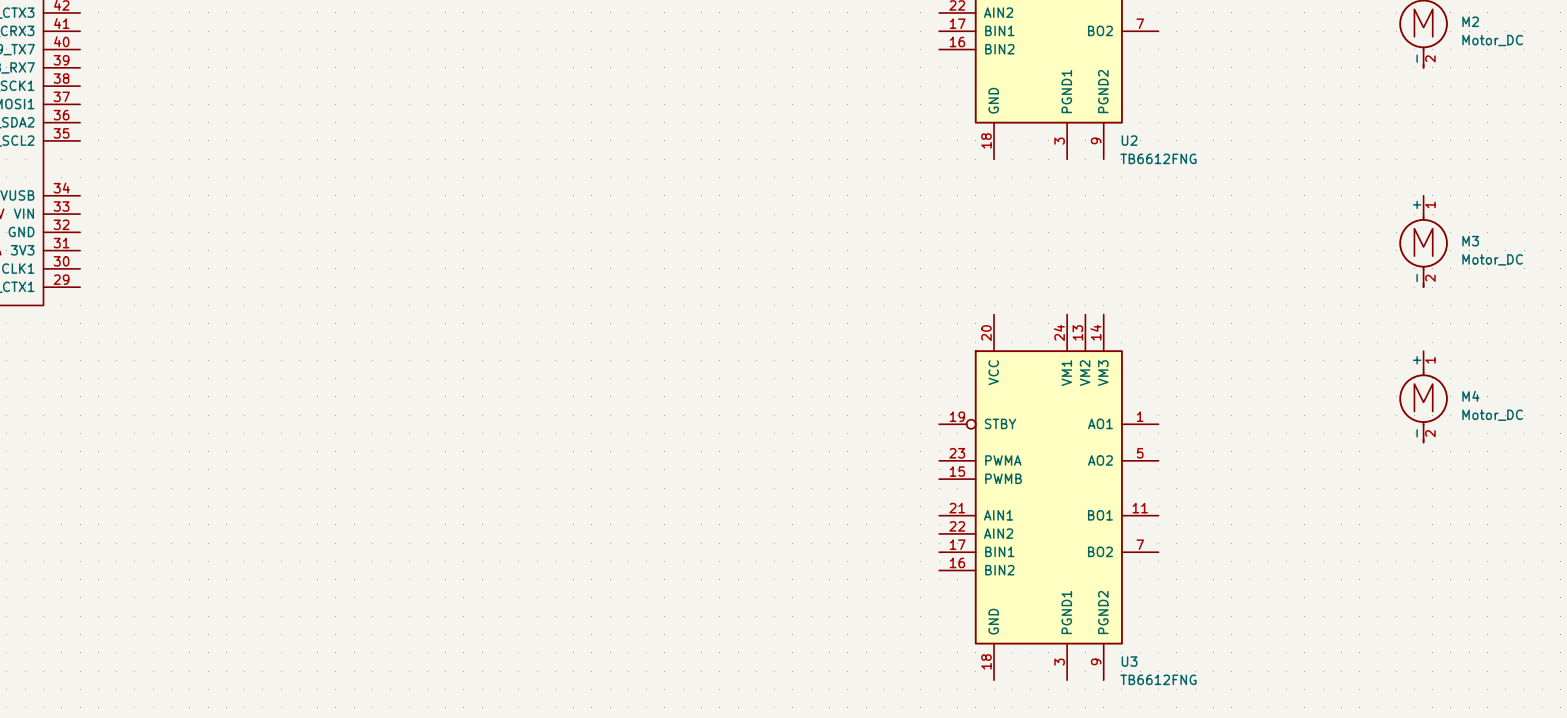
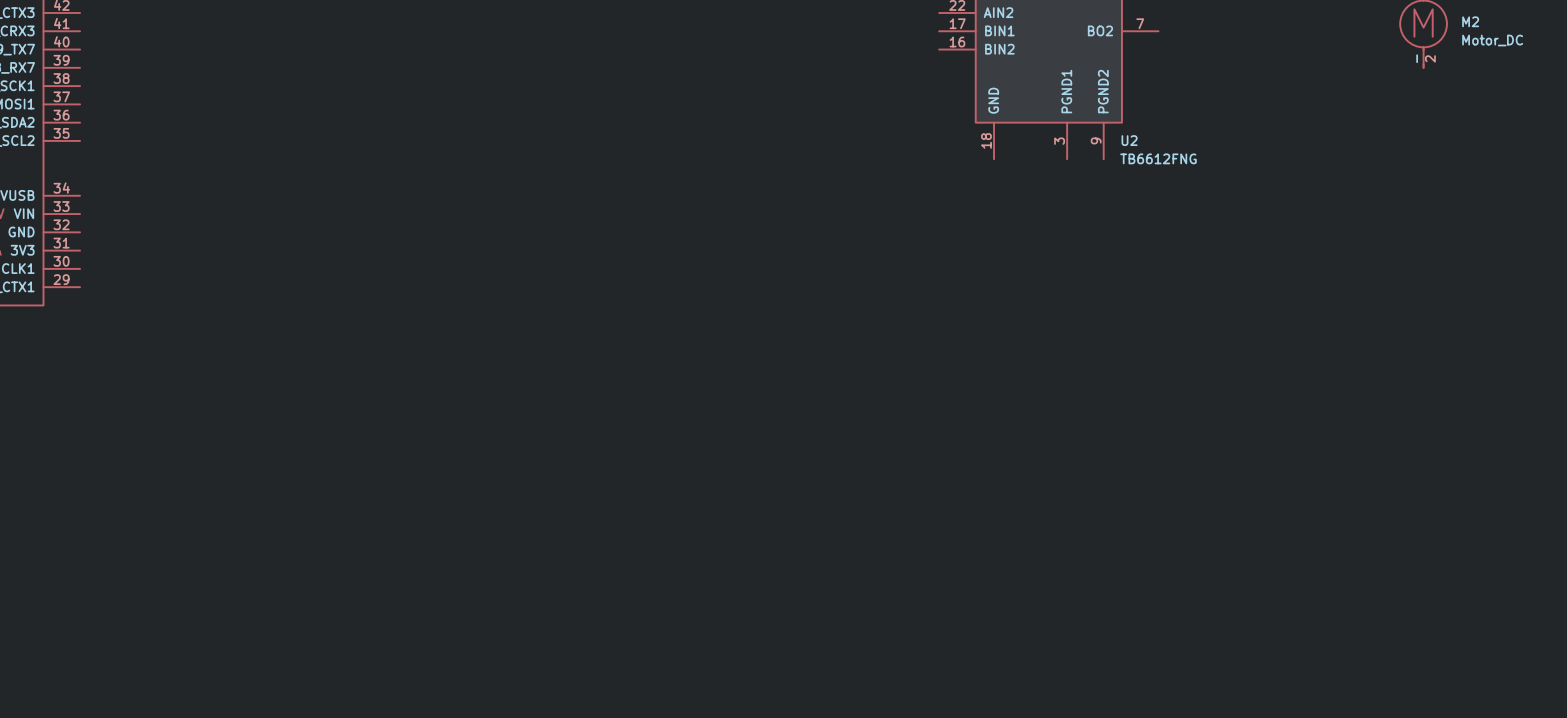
M3: Motor_DC (1423, 241) -> none
M4: Motor_DC (1423, 396) -> none
U3: TB6612FNG (1048, 497) -> none

